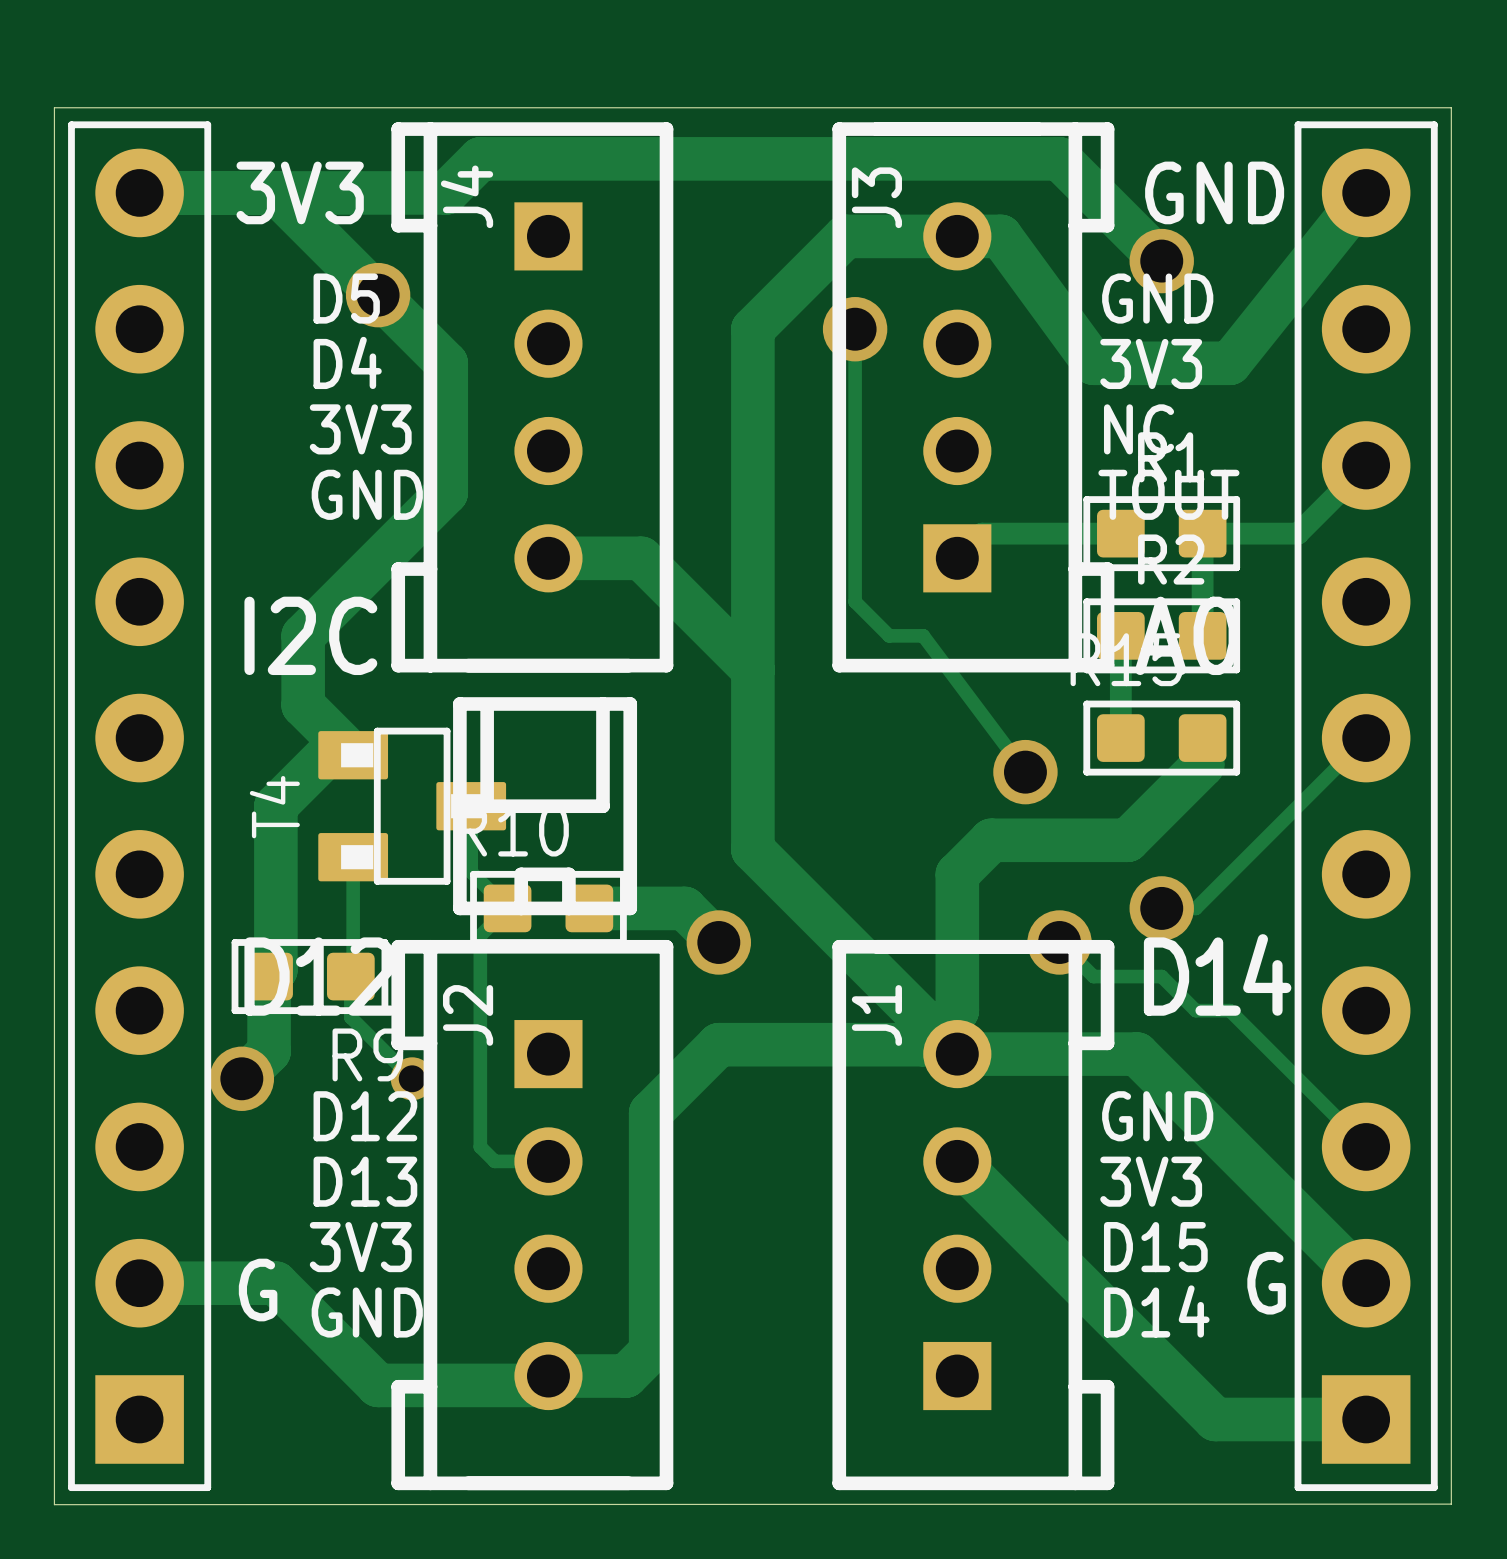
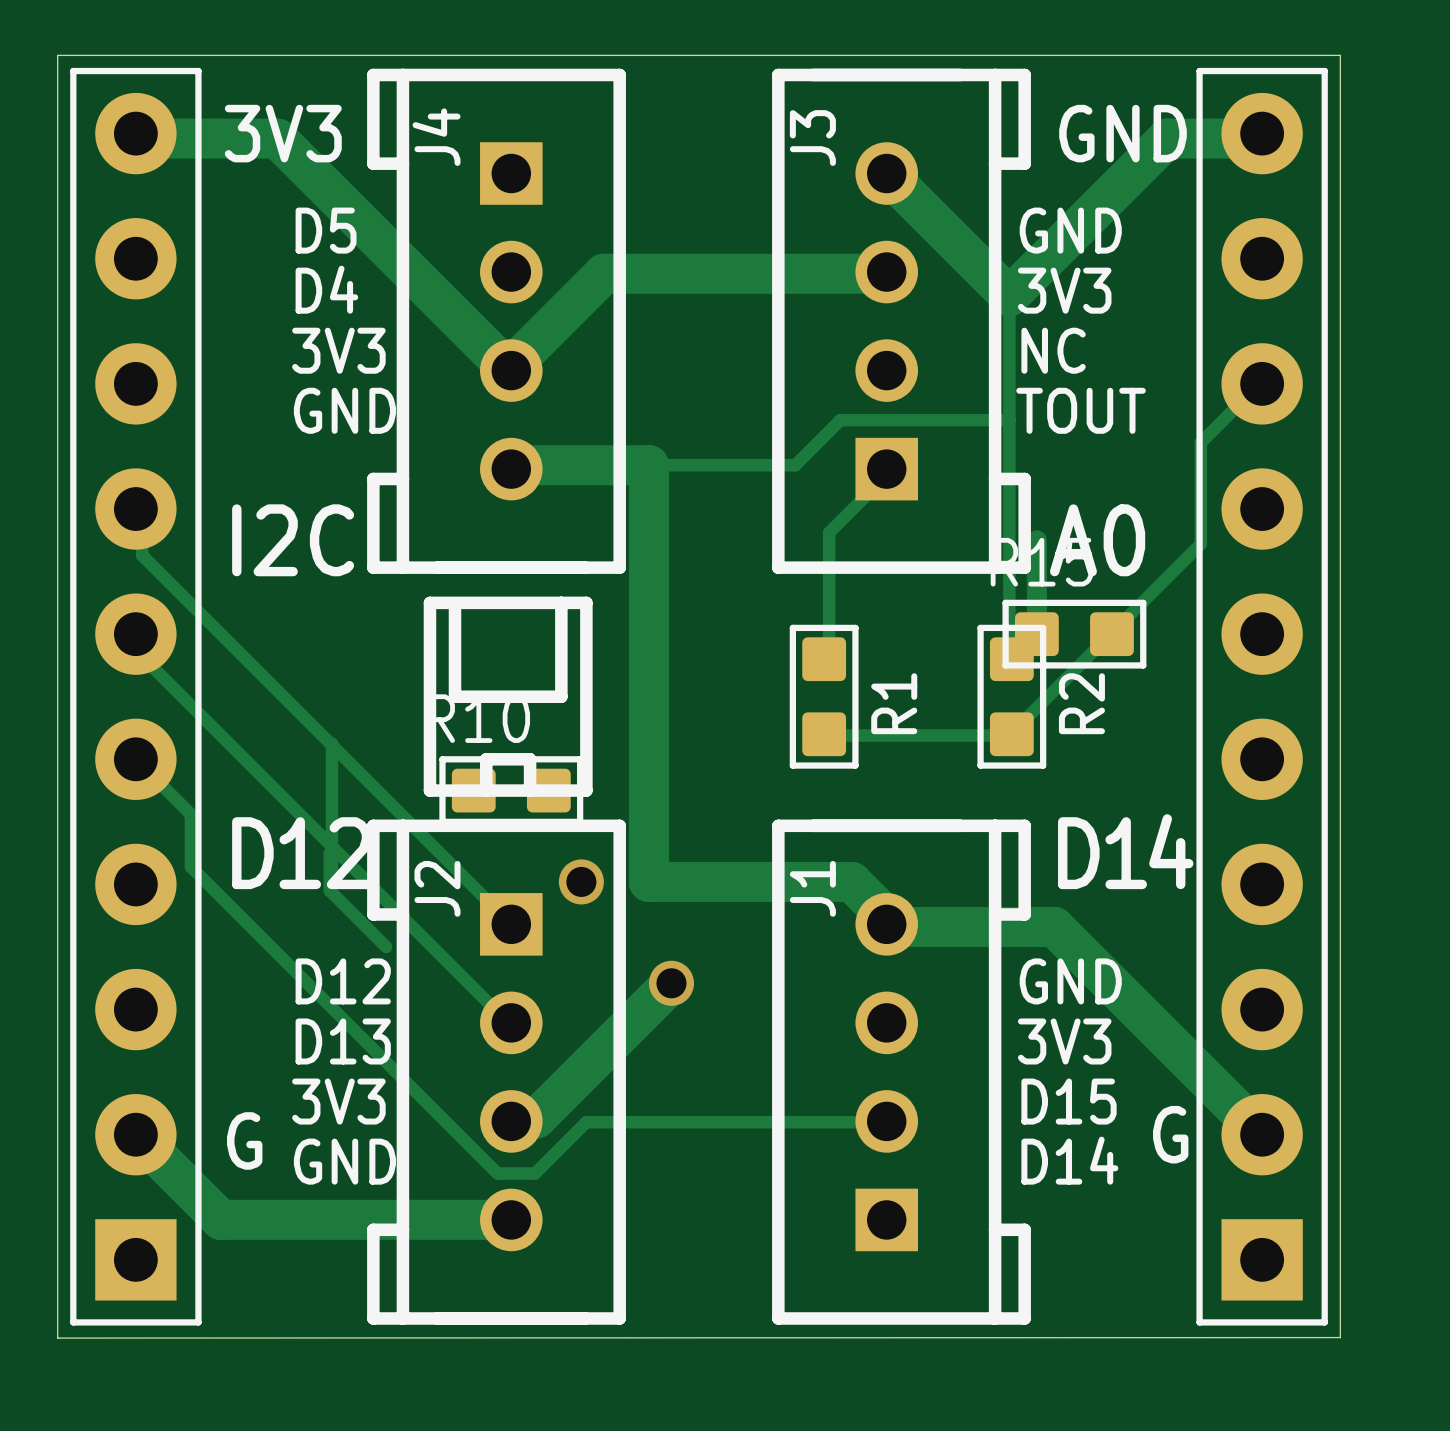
track: (139, 192) (446, 192) (480, 158) (1059, 158) (1161, 261) -> (135, 133) (142, 138) (277, 138) (511, 370) (513, 363) (603, 273) (885, 273) (886, 272)
track: (275, 192) (446, 363) (446, 492) (303, 635) (303, 705) (353, 755) (326, 755) (275, 806) (275, 969) (269, 976) (269, 1051) (241, 1078) -> none
track: (1366, 192) (1229, 363) (1093, 363) (1000, 236) (845, 236) (752, 329) (752, 849) (957, 1054) (1137, 1054) (1139, 1056) -> (1262, 133) (1257, 138) (1167, 138) (1009, 296)
track: none -> (886, 173) (1009, 296)
via: (1161, 261) -> none
via: (378, 295) -> none
track: (855, 329) (855, 601) (889, 635) (923, 635) (1025, 772) -> none
via: (855, 329) -> none
track: none -> (1009, 296) (1009, 656) (1011, 659)
track: (1366, 465) (1298, 533) (1202, 533) (1202, 635) -> (1262, 383) (1257, 386) (1200, 442) (1200, 544) (1011, 734) (824, 734)
track: none -> (1009, 420) (840, 420) (795, 465) (648, 465)
track: (1120, 533) (981, 533) (957, 558) -> (824, 659) (829, 656) (829, 532) (885, 476) (886, 469)
R1 rotation: 0° (1161, 533) -> 90° clockwise (824, 696)
R1 position: (1161, 533) -> (824, 696)
track: none -> (648, 465) (648, 881) (851, 881) (885, 915) (886, 924) (896, 926) (1054, 926)
track: (548, 558) (641, 558) (752, 669) -> (511, 469) (513, 465) (648, 465)
track: none -> (135, 509) (142, 510) (142, 555) (513, 926)
R2 rotation: 0° (1161, 635) -> 90° clockwise (1011, 696)
R2 position: (1161, 635) -> (1011, 696)
track: (1202, 738) (1202, 765) (1127, 840) (991, 840) (957, 874) (957, 1010) (923, 1044) (718, 1044) (650, 1112) (650, 1351) (625, 1376) (548, 1376) (539, 1385) (378, 1385) (275, 1283) (139, 1283) -> (511, 1219) (220, 1219) (135, 1134)
track: (1366, 738) (1195, 908) (1161, 908) -> none
via: (1025, 772) -> none
T4: (412, 806) -> none
track: (471, 806) (471, 872) (507, 908) (480, 935) (480, 1146) (494, 1161) (548, 1161) -> (135, 634) (142, 634) (142, 656) (502, 1017) (511, 1022)
track: none -> (135, 759) (190, 814) (190, 866) (497, 1173) (535, 1173) (586, 1122) (886, 1121)
track: (589, 908) (684, 908) (718, 942) -> none
via: (1161, 908) -> none
via: (718, 942) -> none
track: (1059, 942) (1093, 976) (1161, 976) (1195, 1010) (1229, 1010) (1366, 1146) -> none
via: (1059, 942) -> none
R9: (309, 976) -> none
via: none -> (581, 881)
via: (241, 1078) -> none
via: (412, 1078) -> none
track: none -> (671, 983) (536, 1118) (513, 1118) (511, 1121)
via: none -> (671, 983)
track: (957, 1161) (1215, 1419) (1366, 1419) -> none

